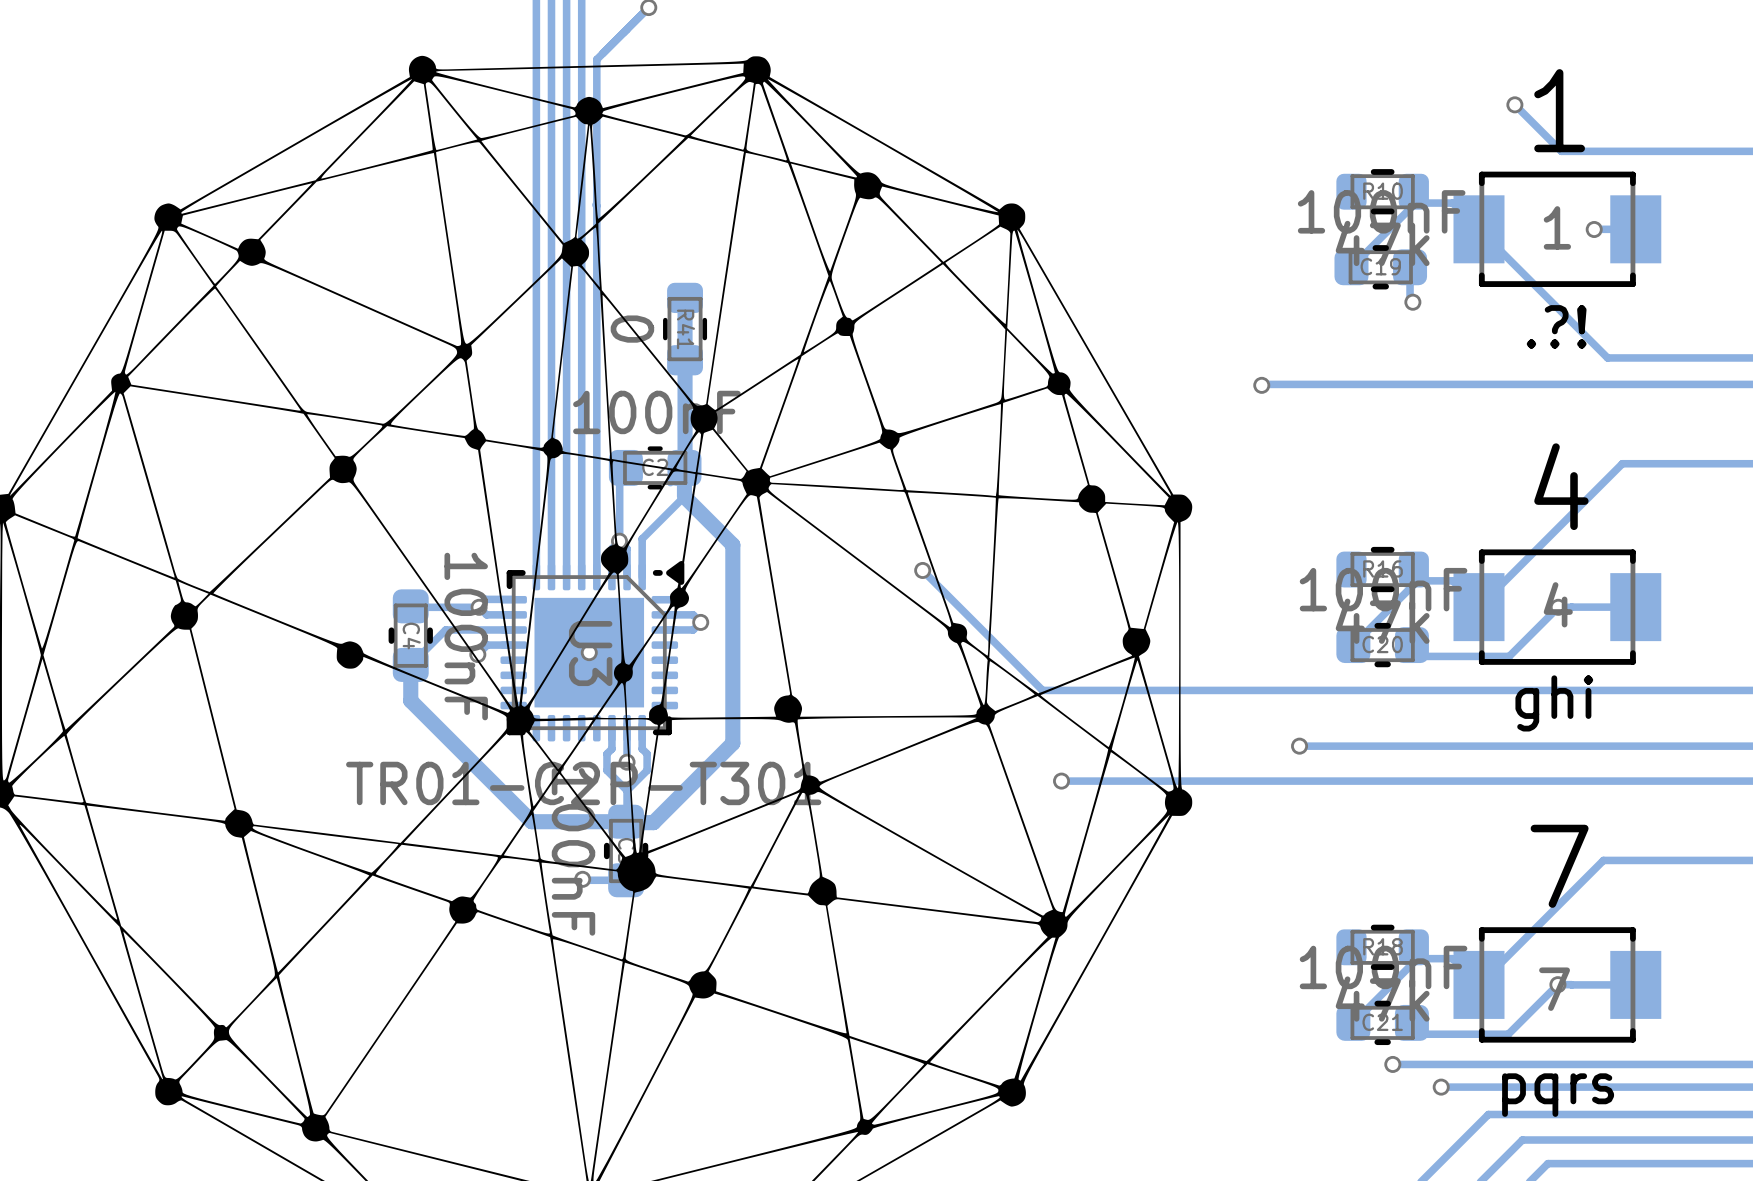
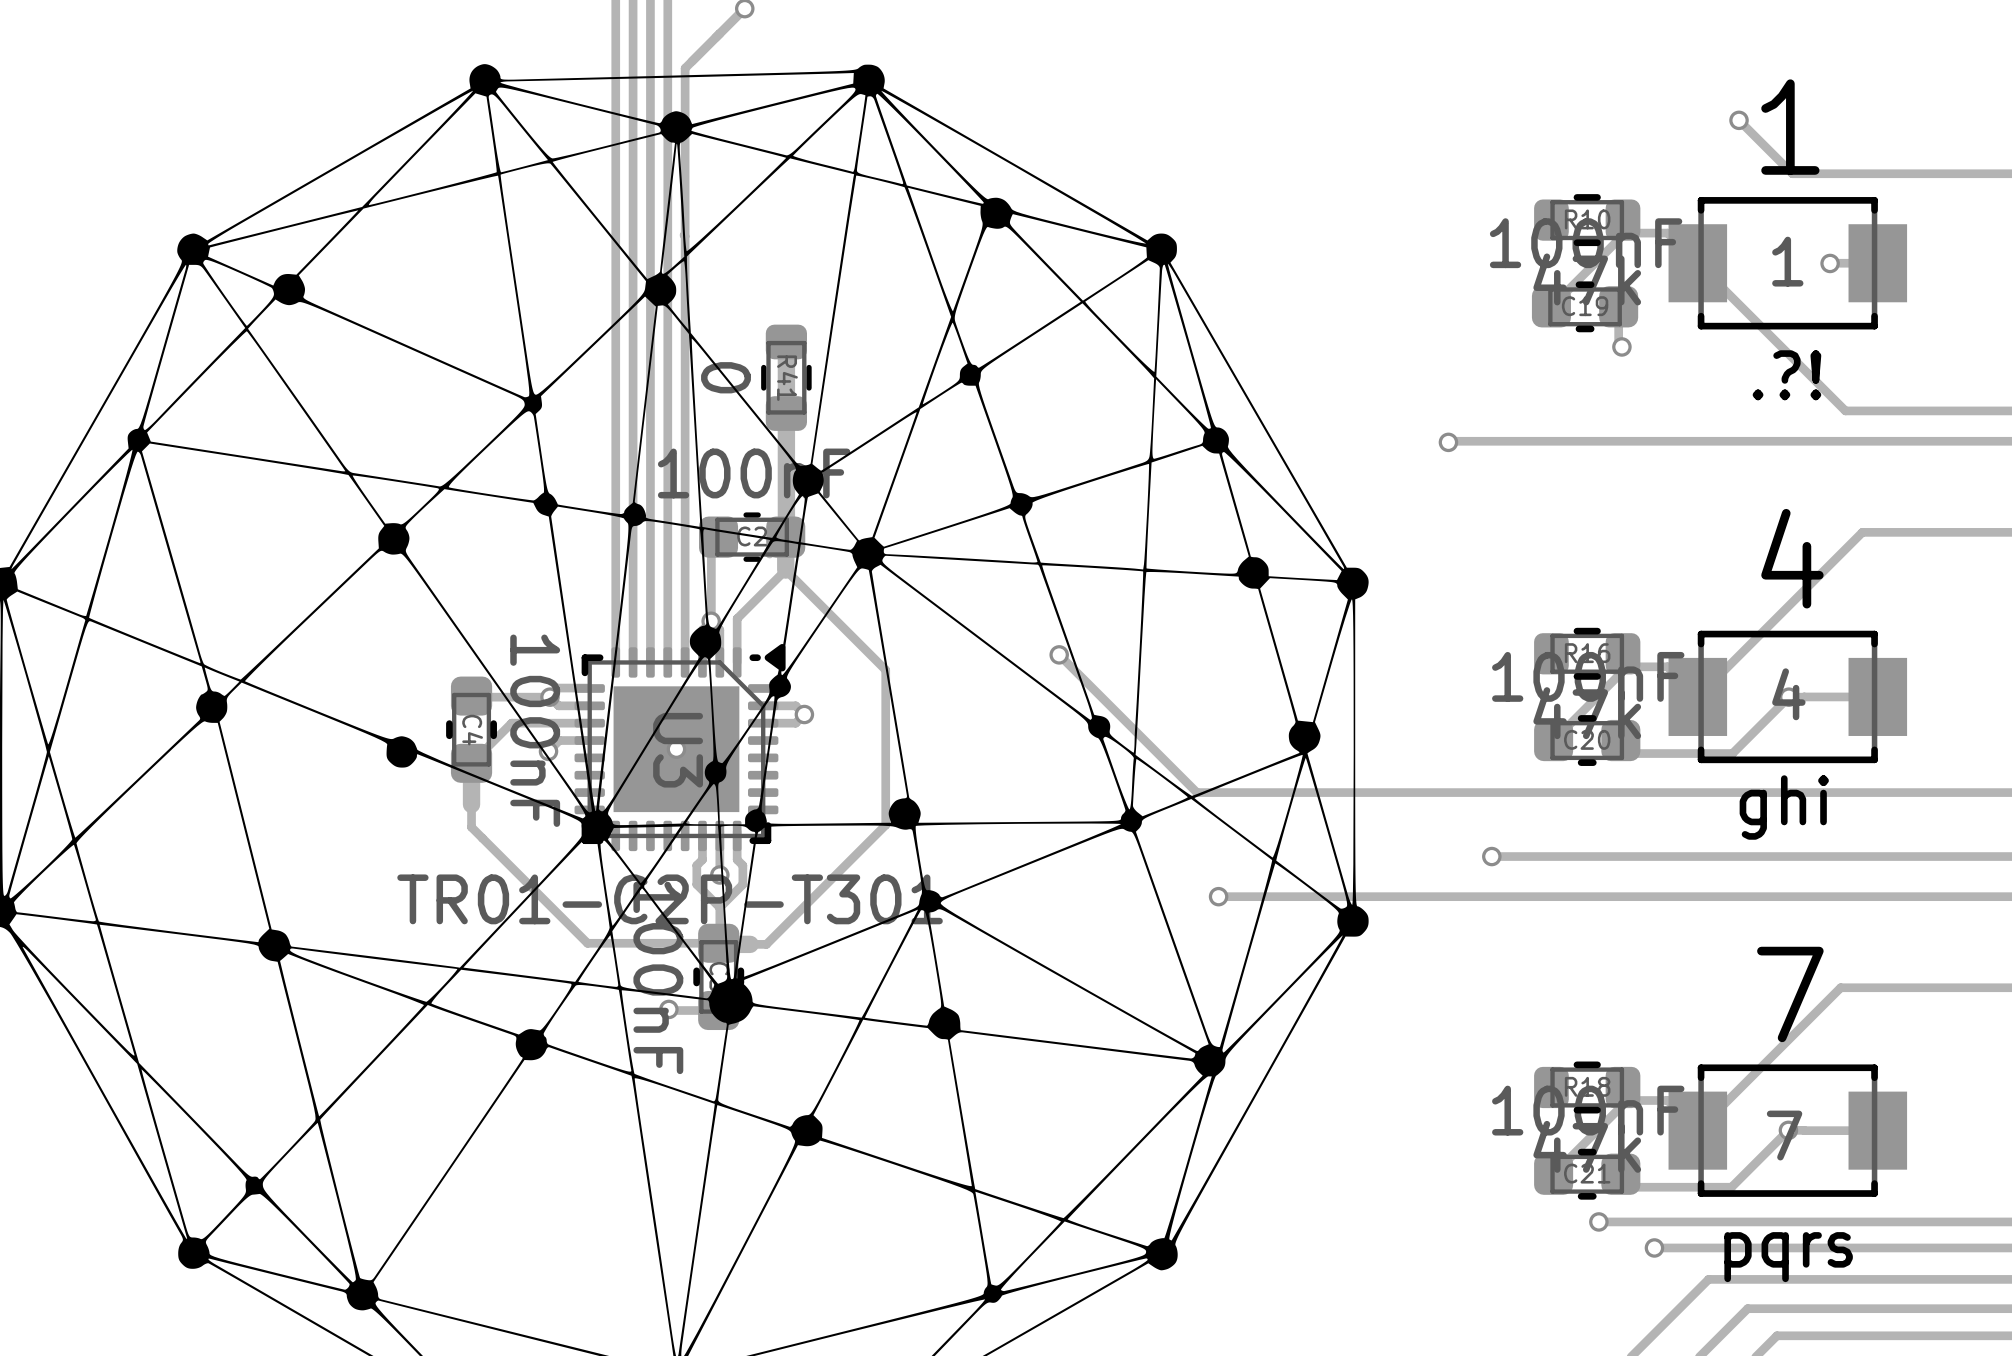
track width: thick (686, 498) (732, 544) -> thin (787, 571) (841, 625)
track: (732, 544) (732, 743) (653, 822) -> (841, 625) (885, 670) (885, 825) (766, 944) (750, 944)
track: (410, 700) (531, 821) -> (471, 804) (471, 827) (587, 943) (610, 943)
track width: thick (626, 821) (531, 821) -> thin (718, 943) (610, 943)

